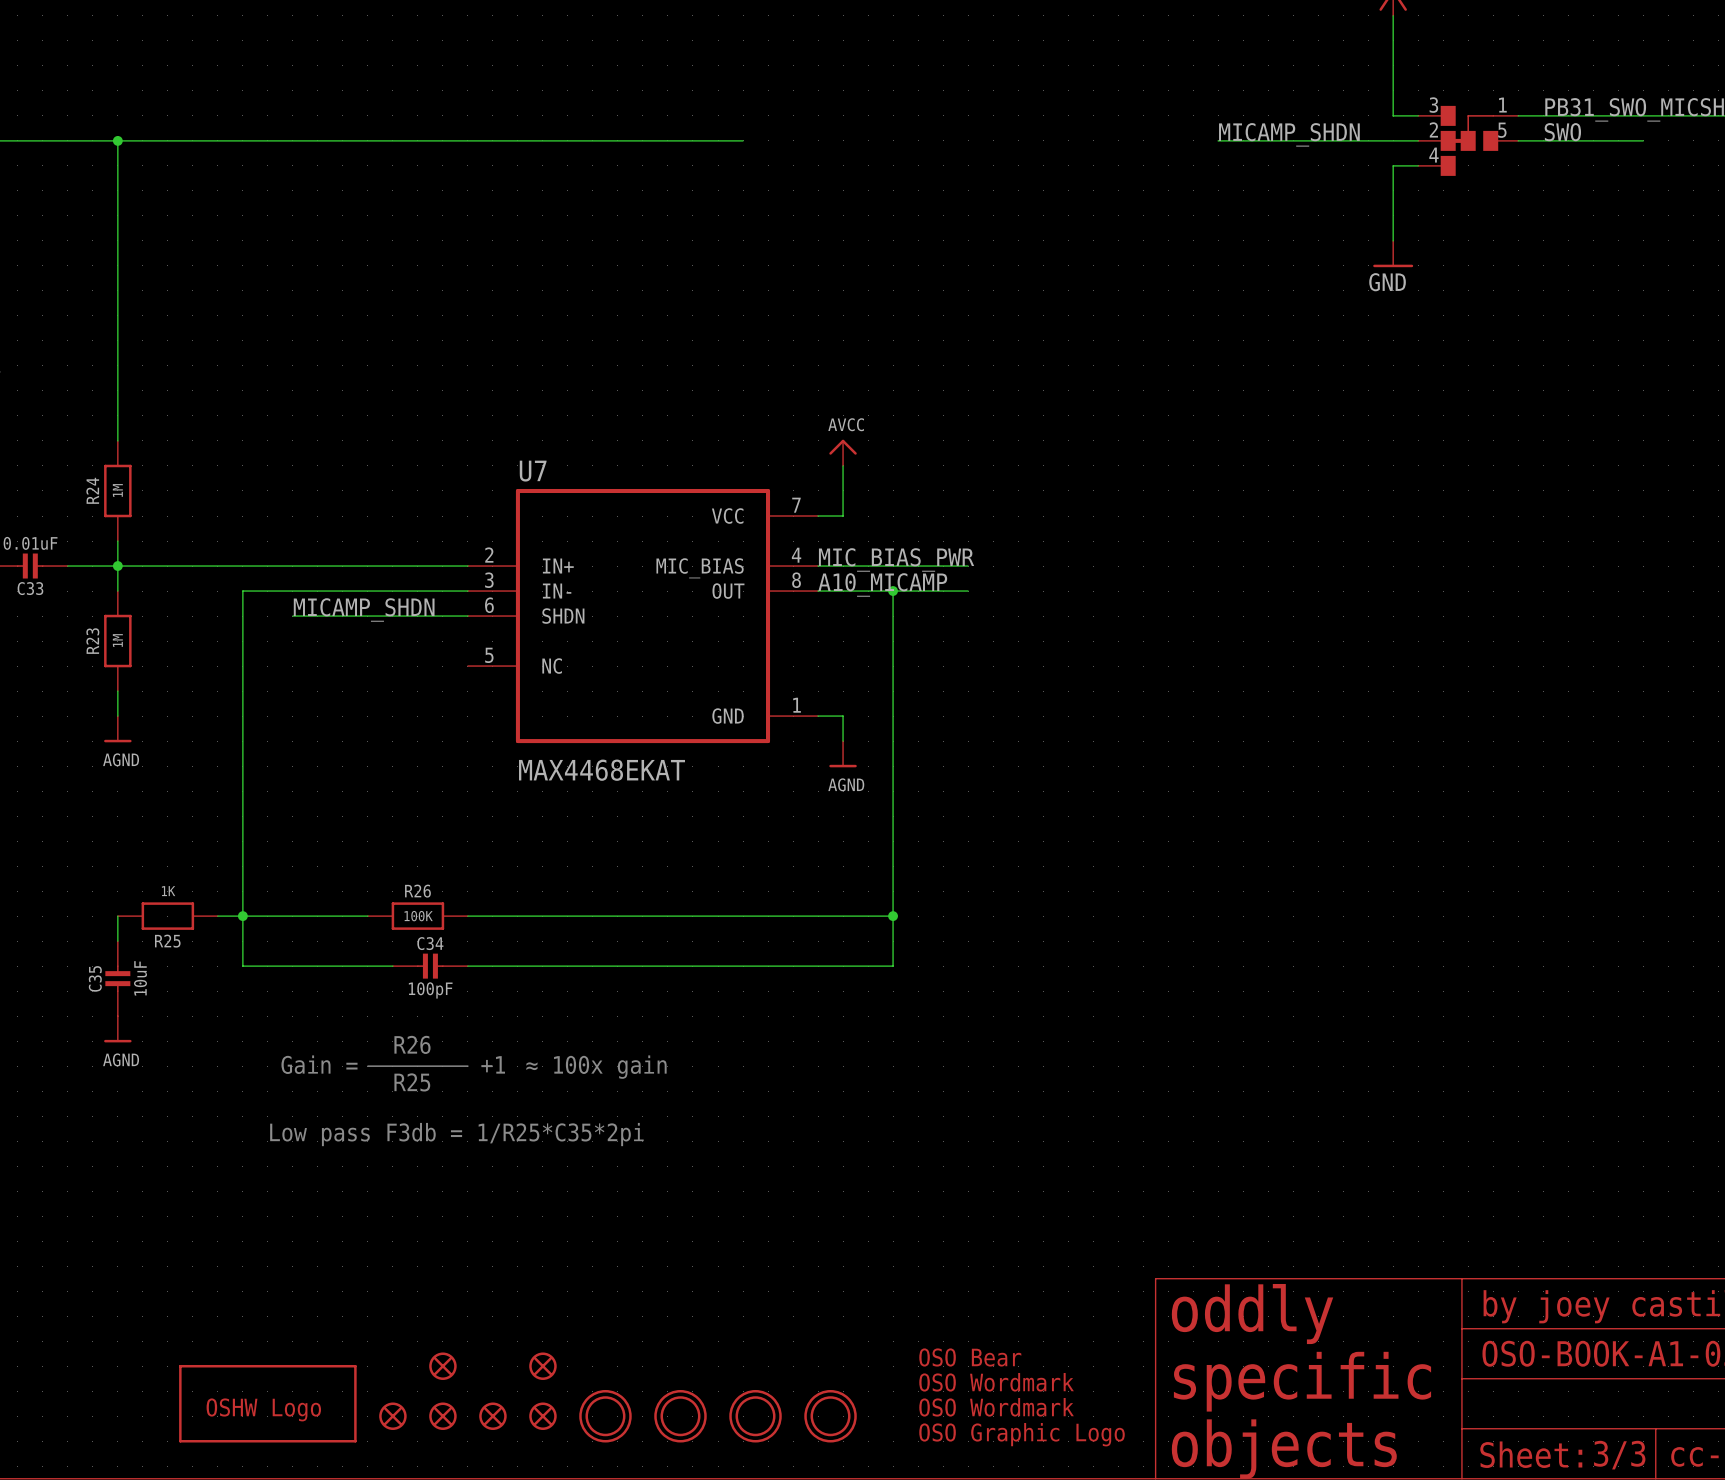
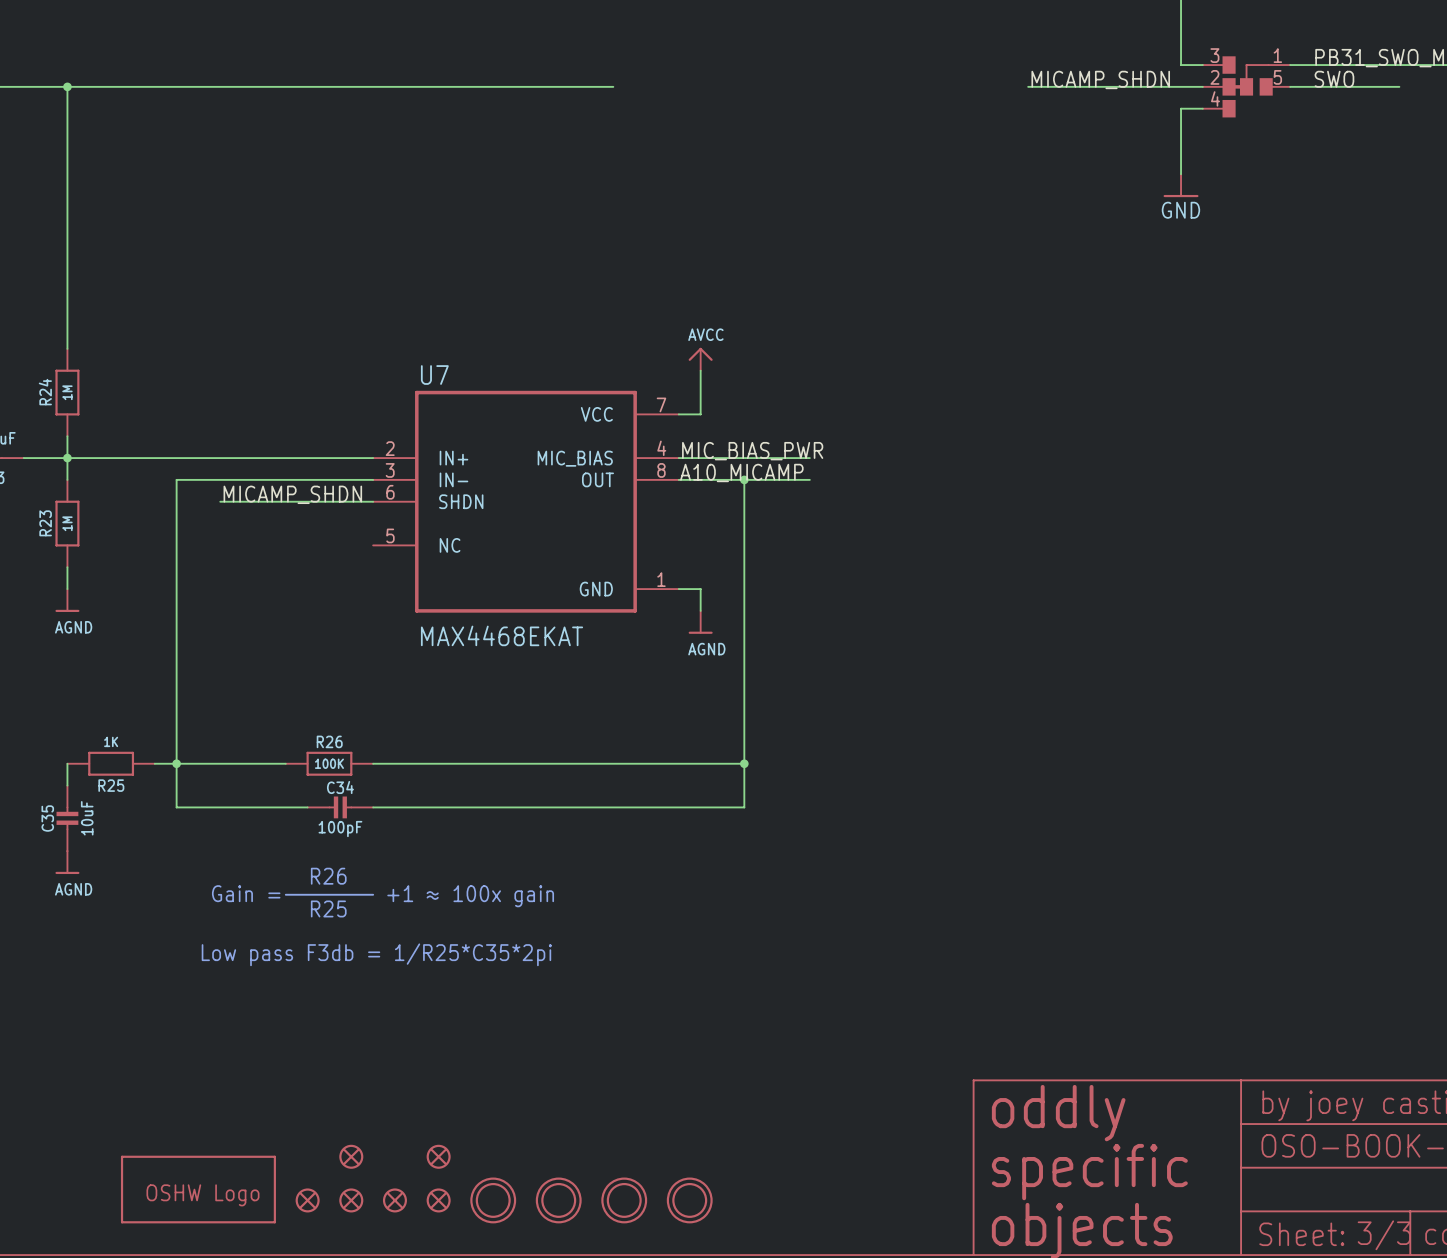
part: (970, 1357) -> none
part: (996, 1382) -> none
part: (996, 1407) -> none
part: (1022, 1434) -> none

